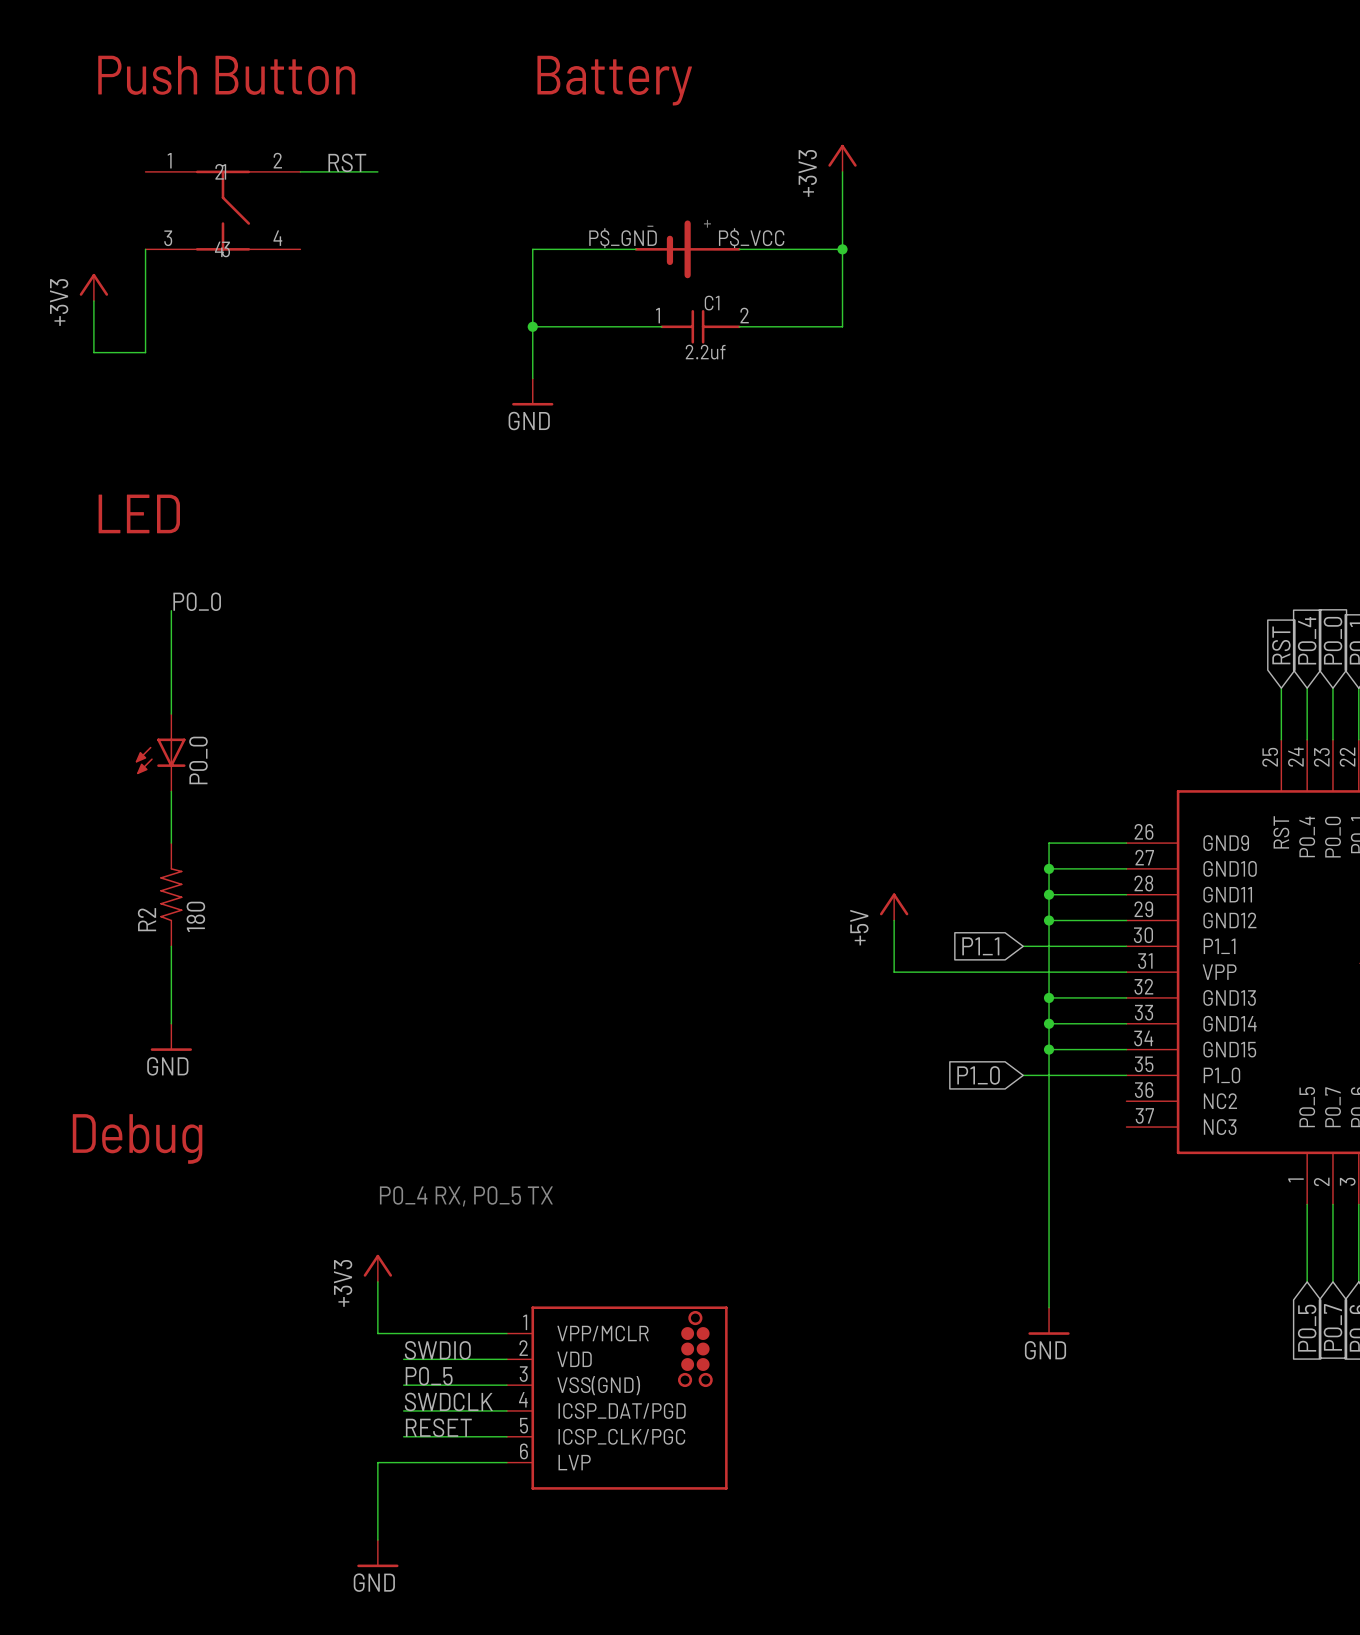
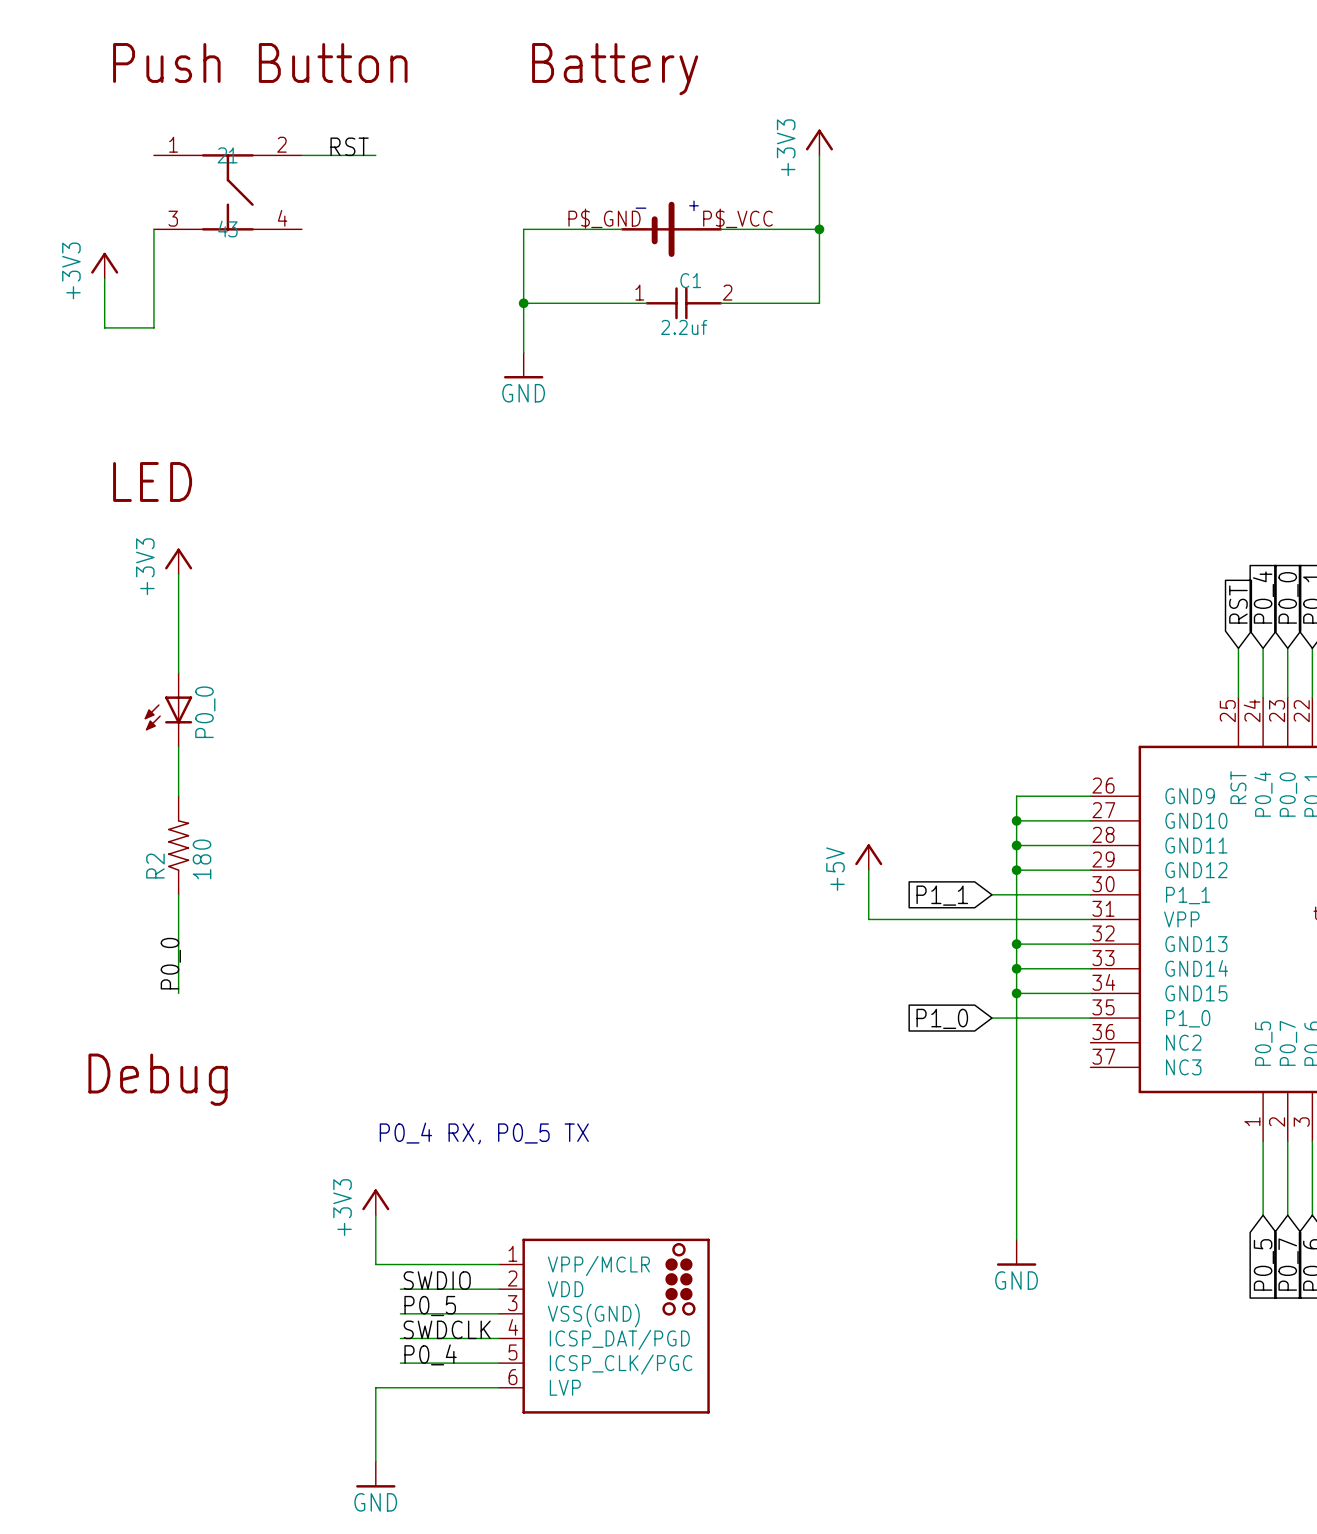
power symbol: none -> +3V3 (178, 561)
label: P0_0 (197, 601) -> none
label: none -> P0_0 (170, 963)
power symbol: GND (171, 1037) -> none
label: RESET (438, 1427) -> P0_4 (430, 1354)

